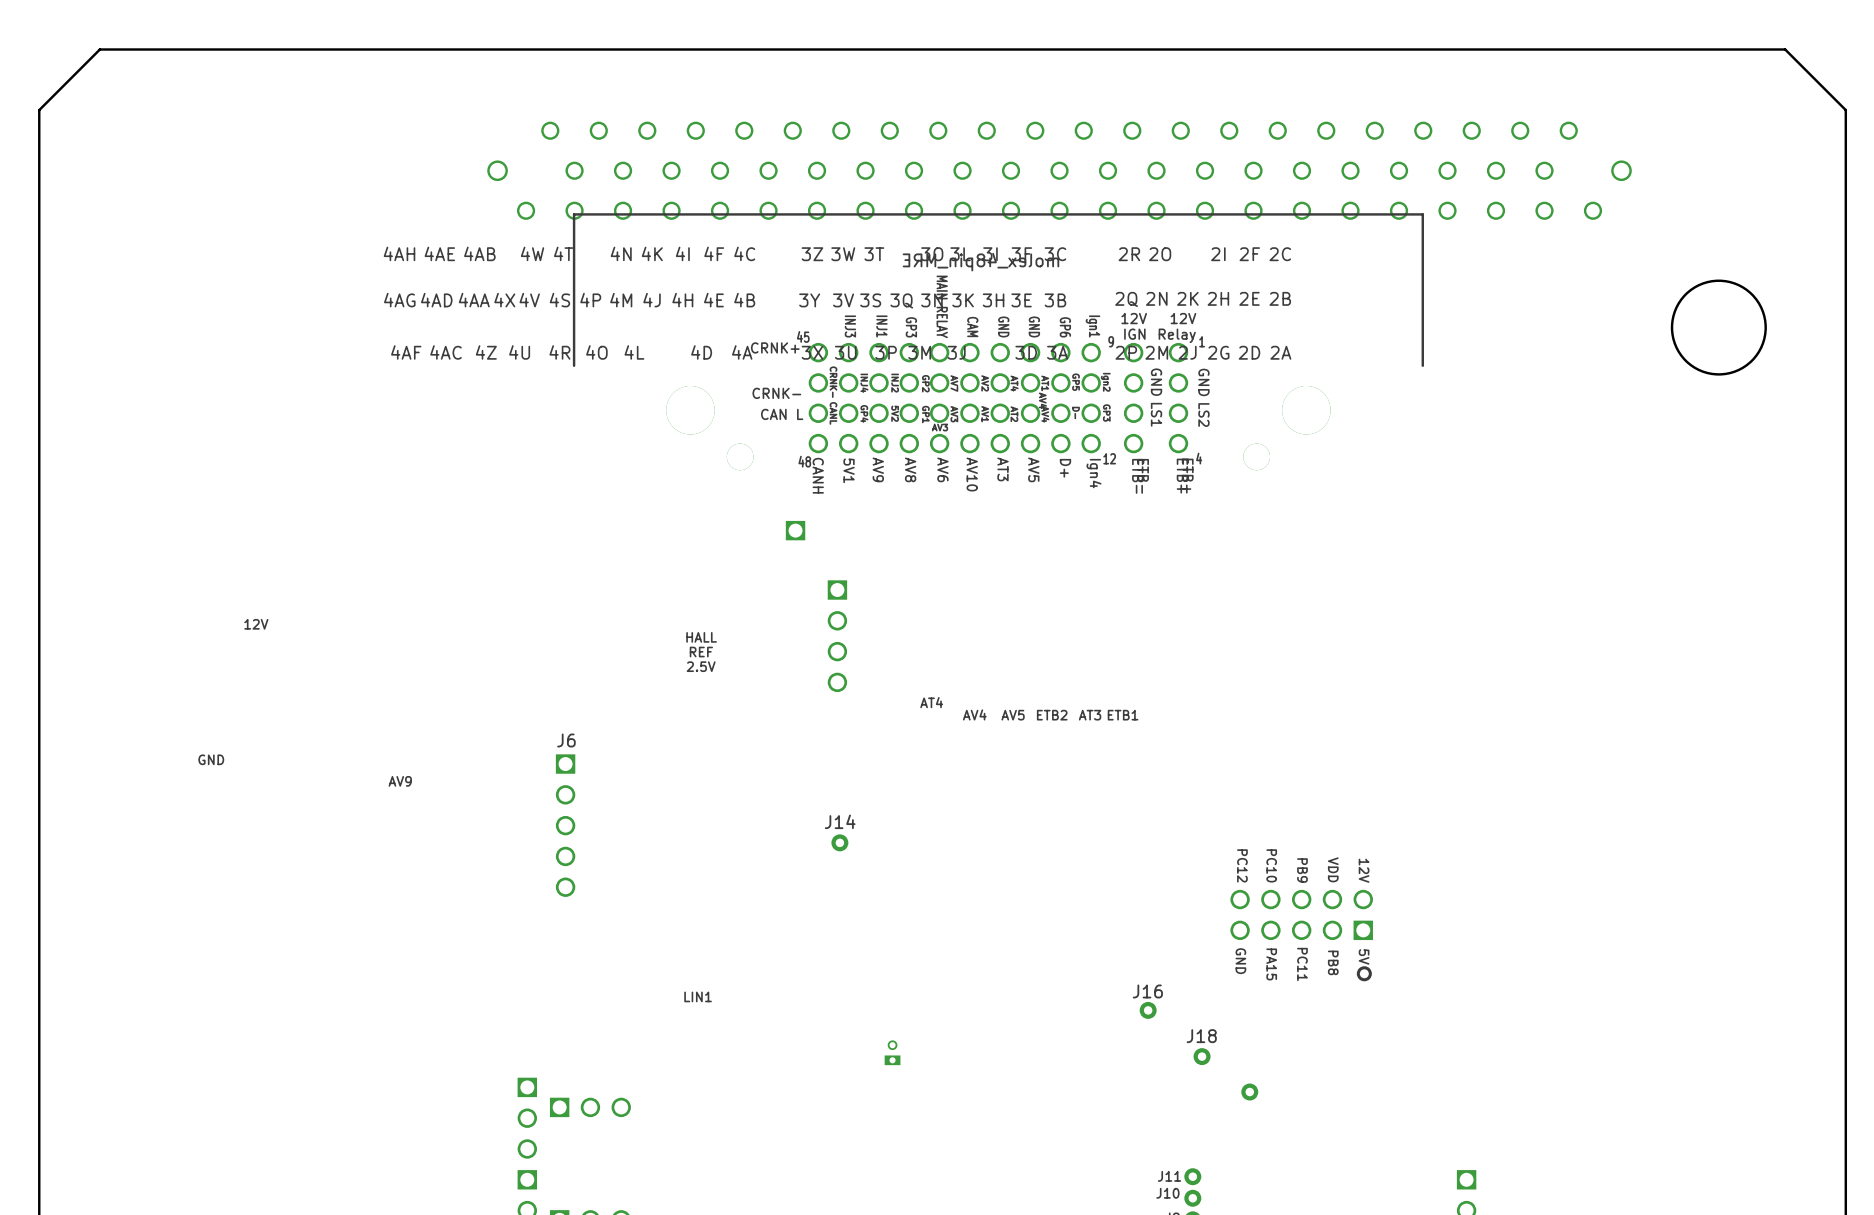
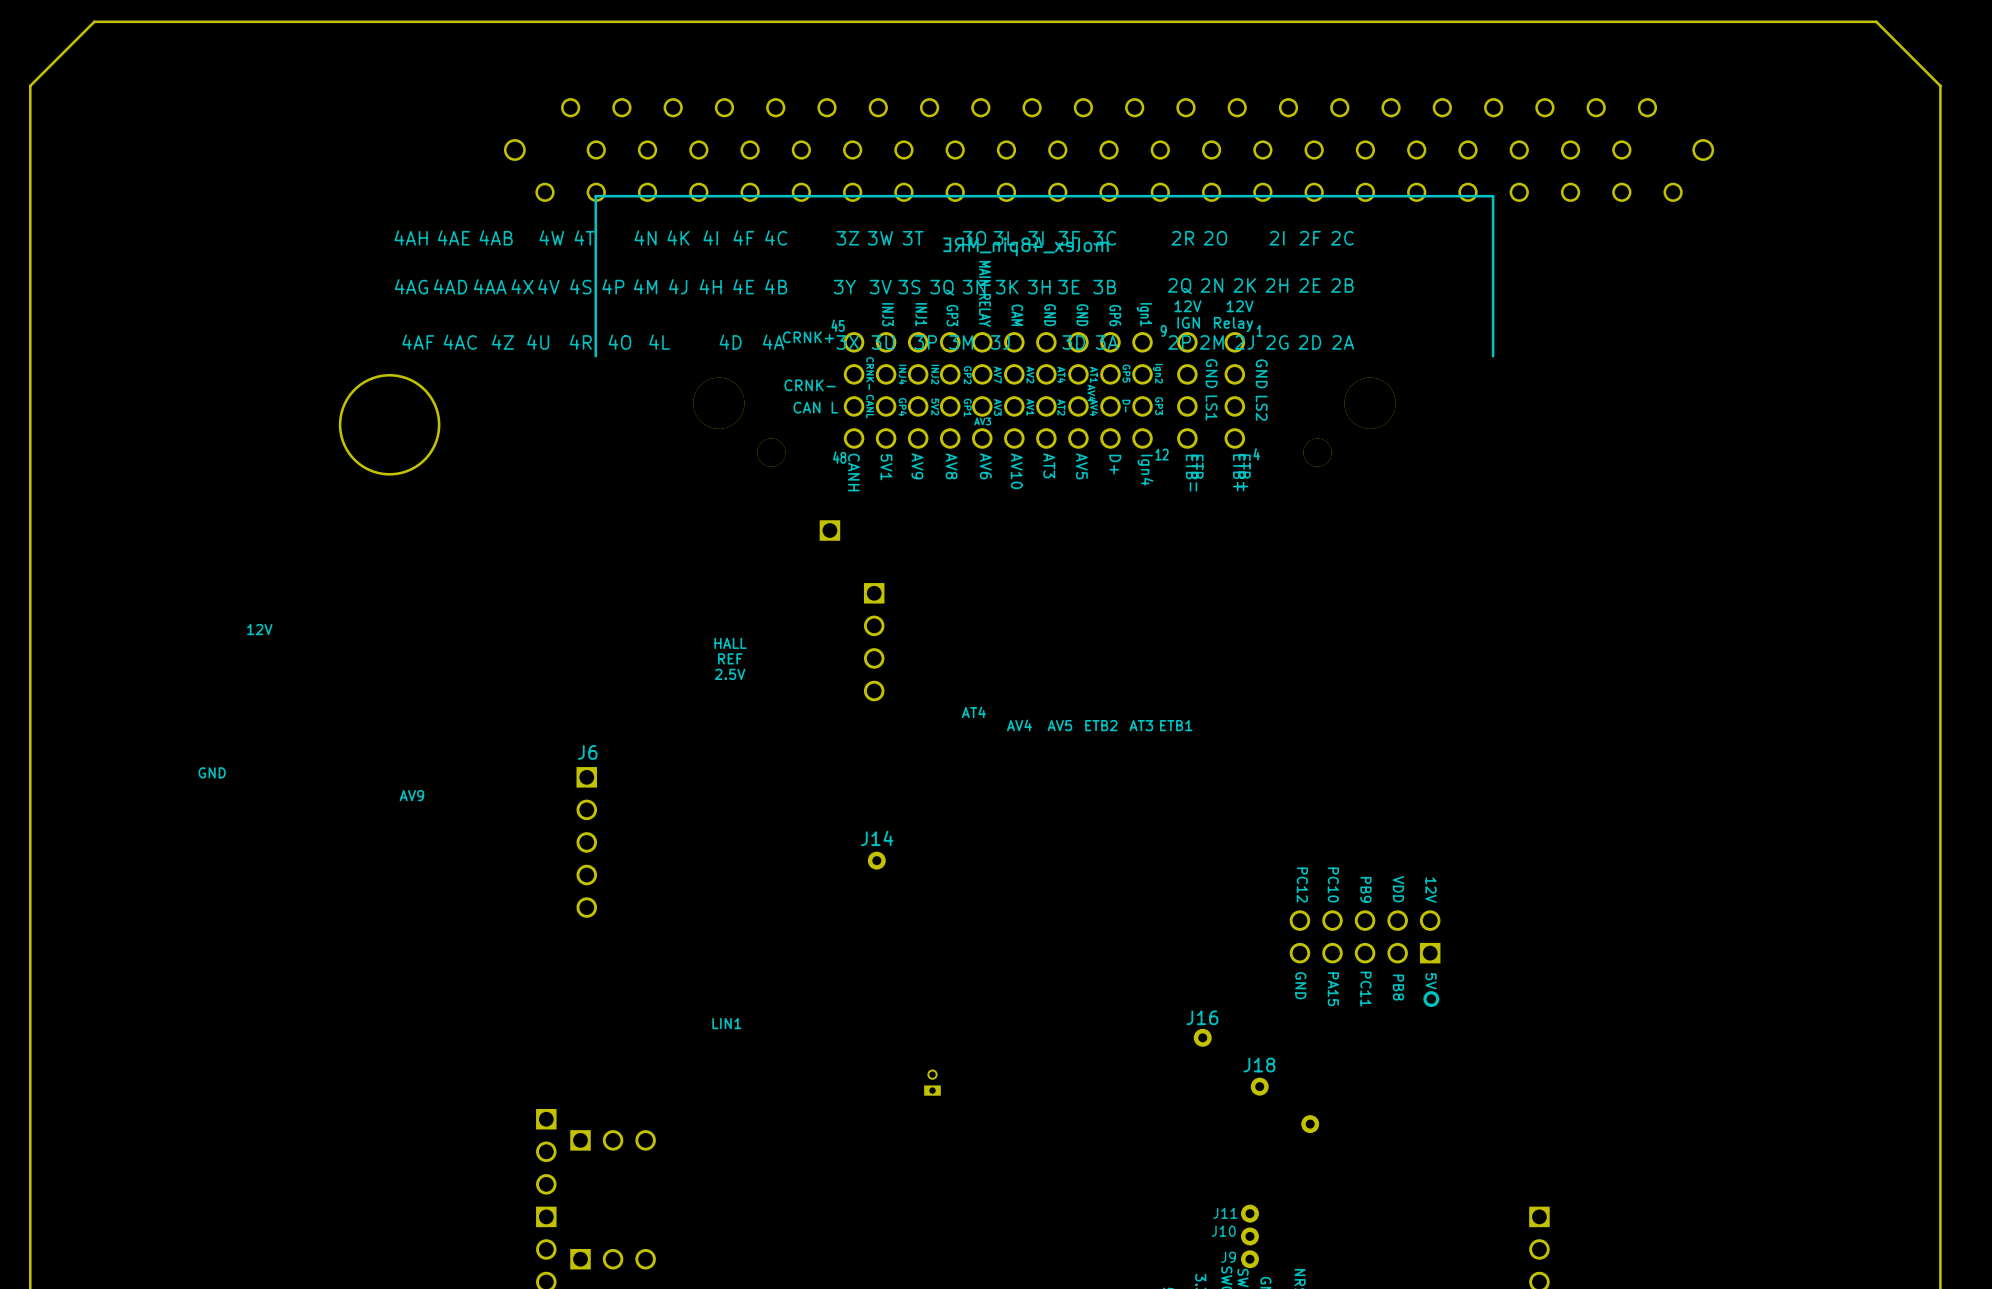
round board edge: [1670, 279, 1767, 376] -> none
round board edge: none -> [338, 373, 441, 476]

